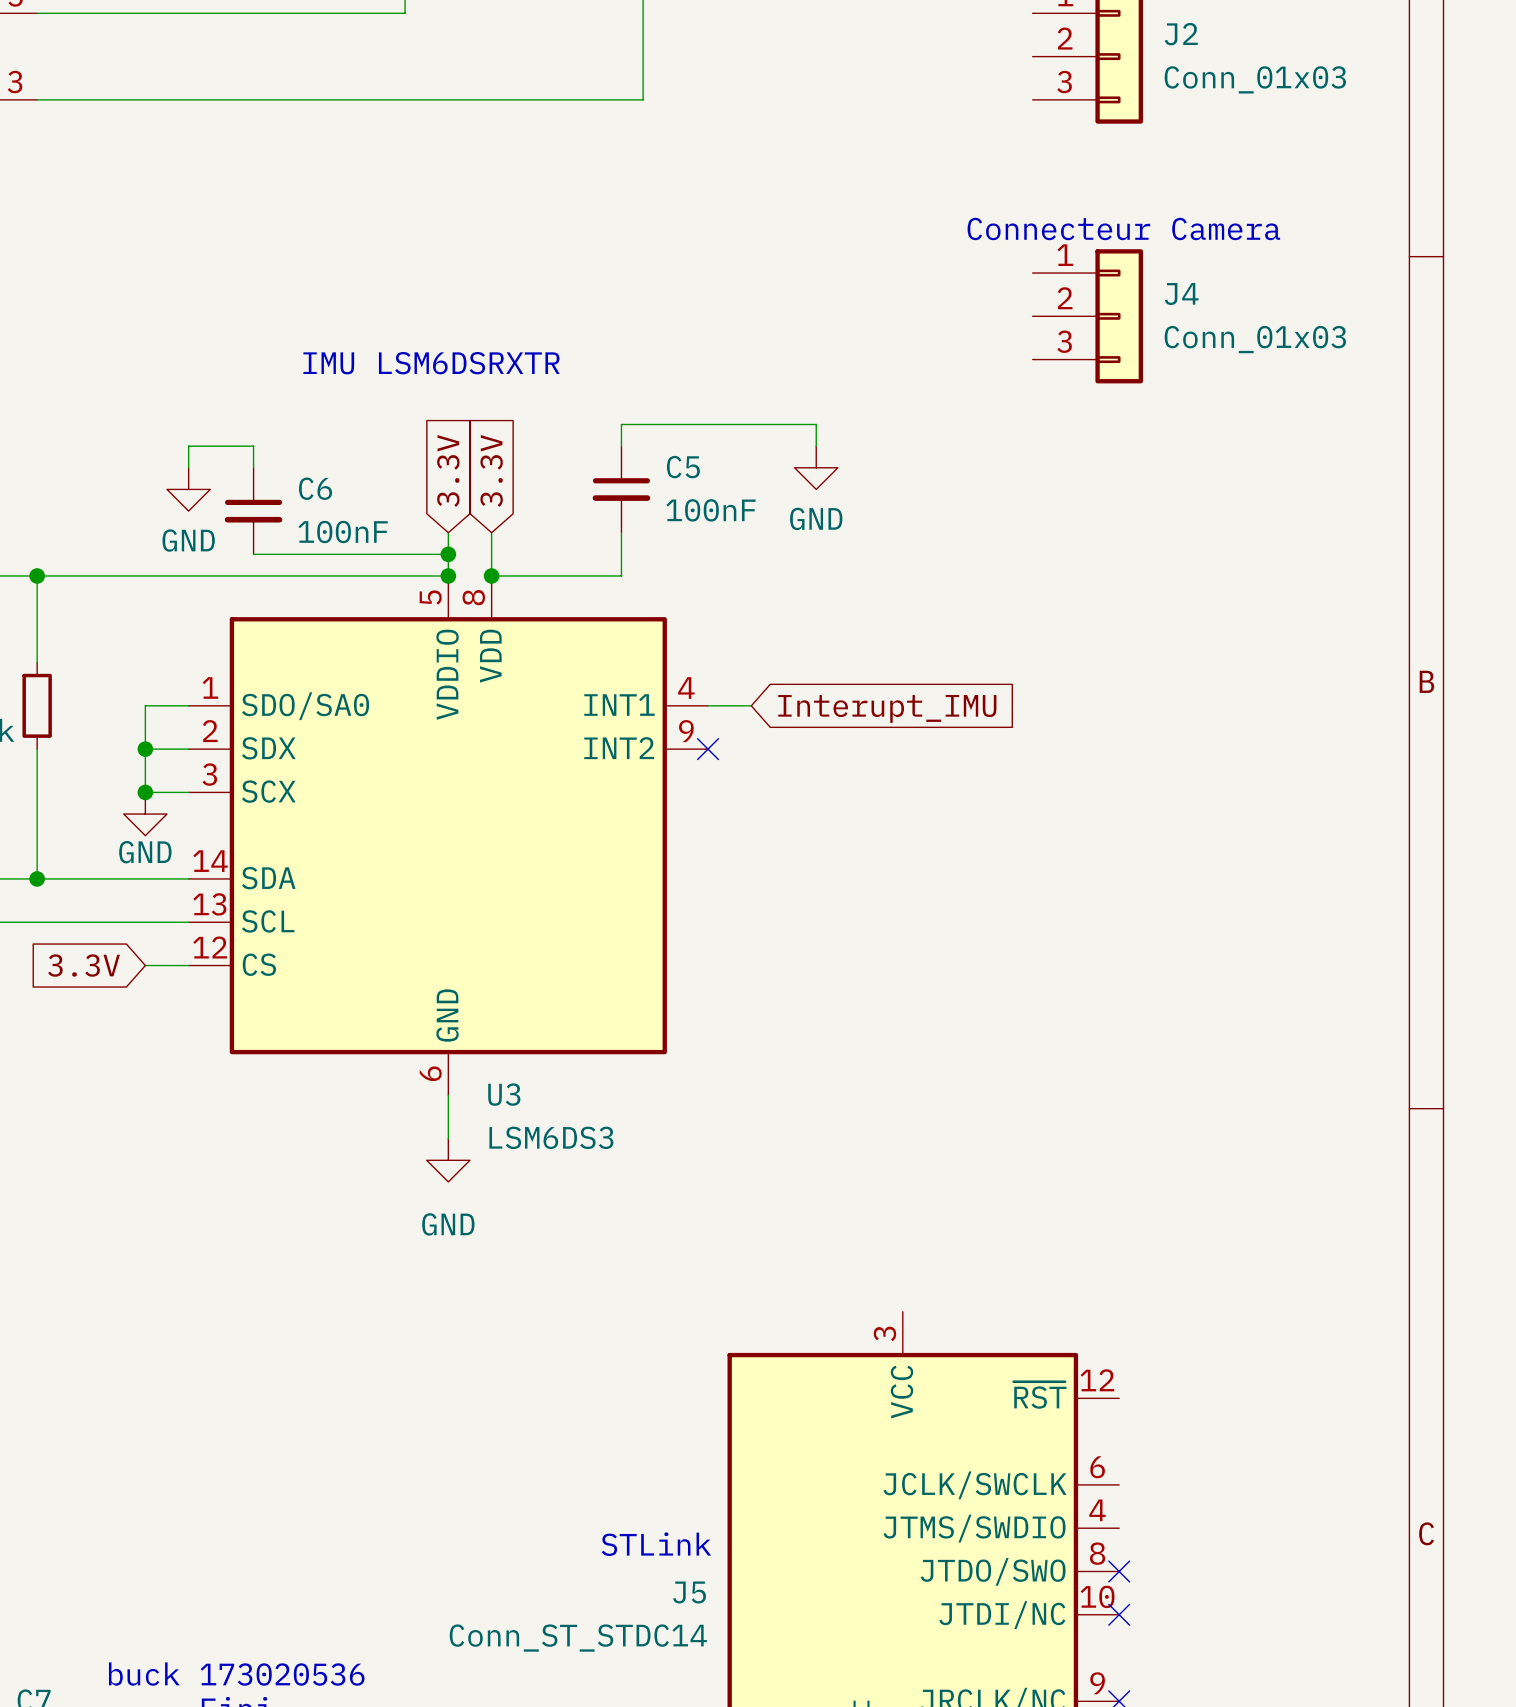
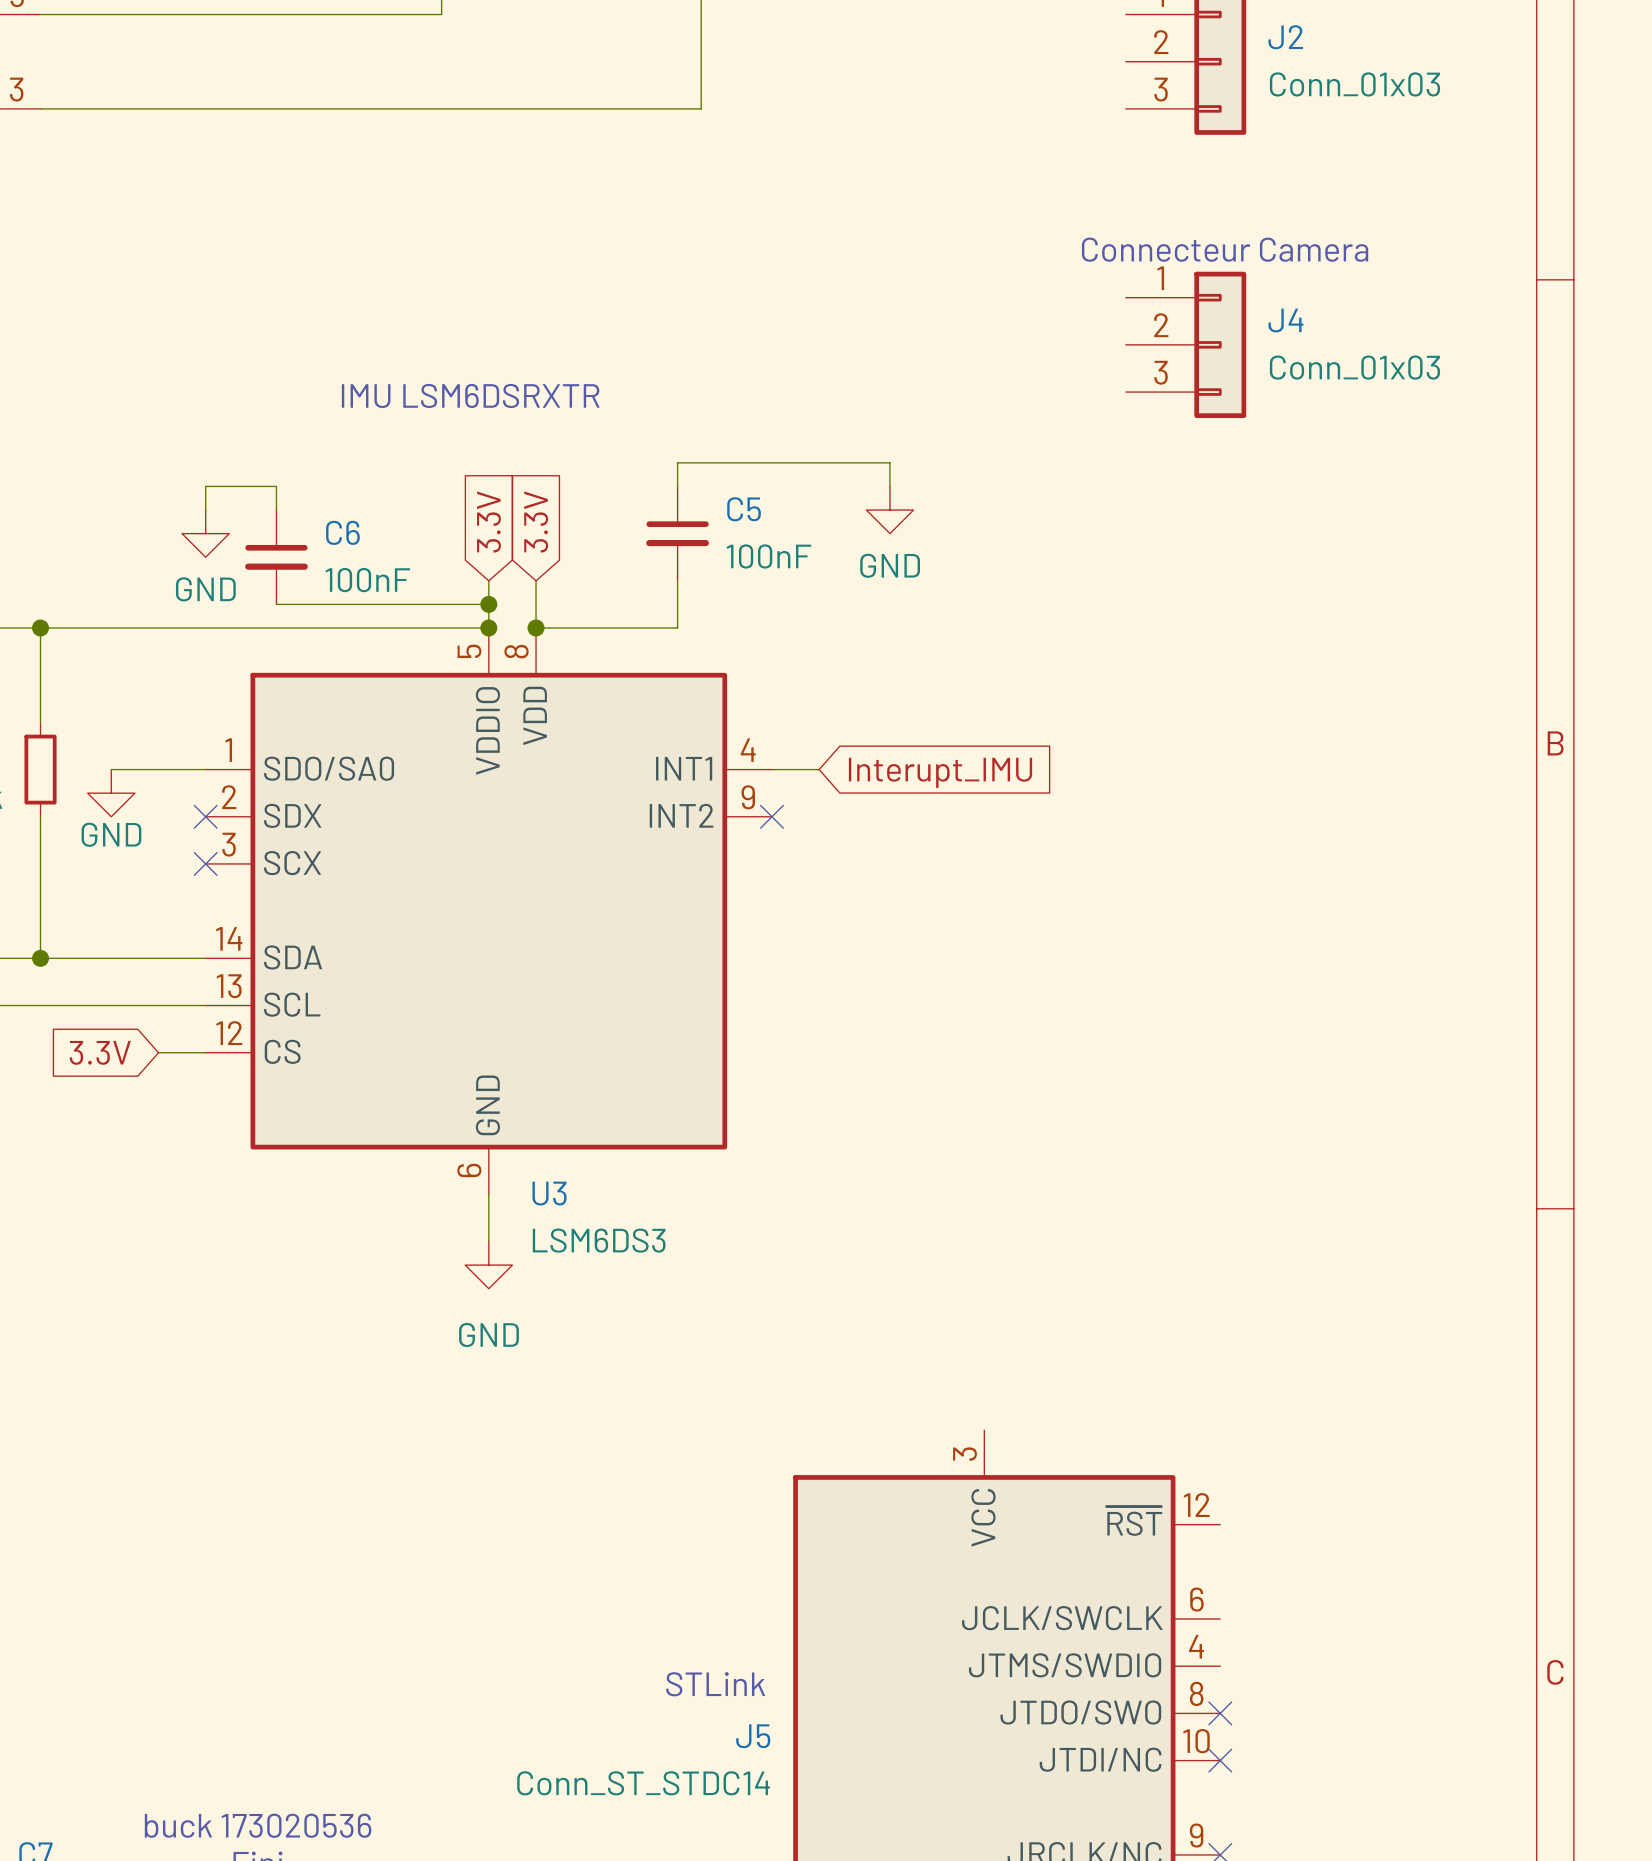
wire: (145, 705) (145, 792) (188, 792) -> (158, 769) (111, 769)
wire: (145, 749) (188, 749) -> none
junction: (145, 749) -> none
no-connect mark: none -> (205, 816)
junction: (145, 792) -> none
no-connect mark: none -> (205, 863)
power symbol position: GND (145, 814) -> GND (111, 793)

